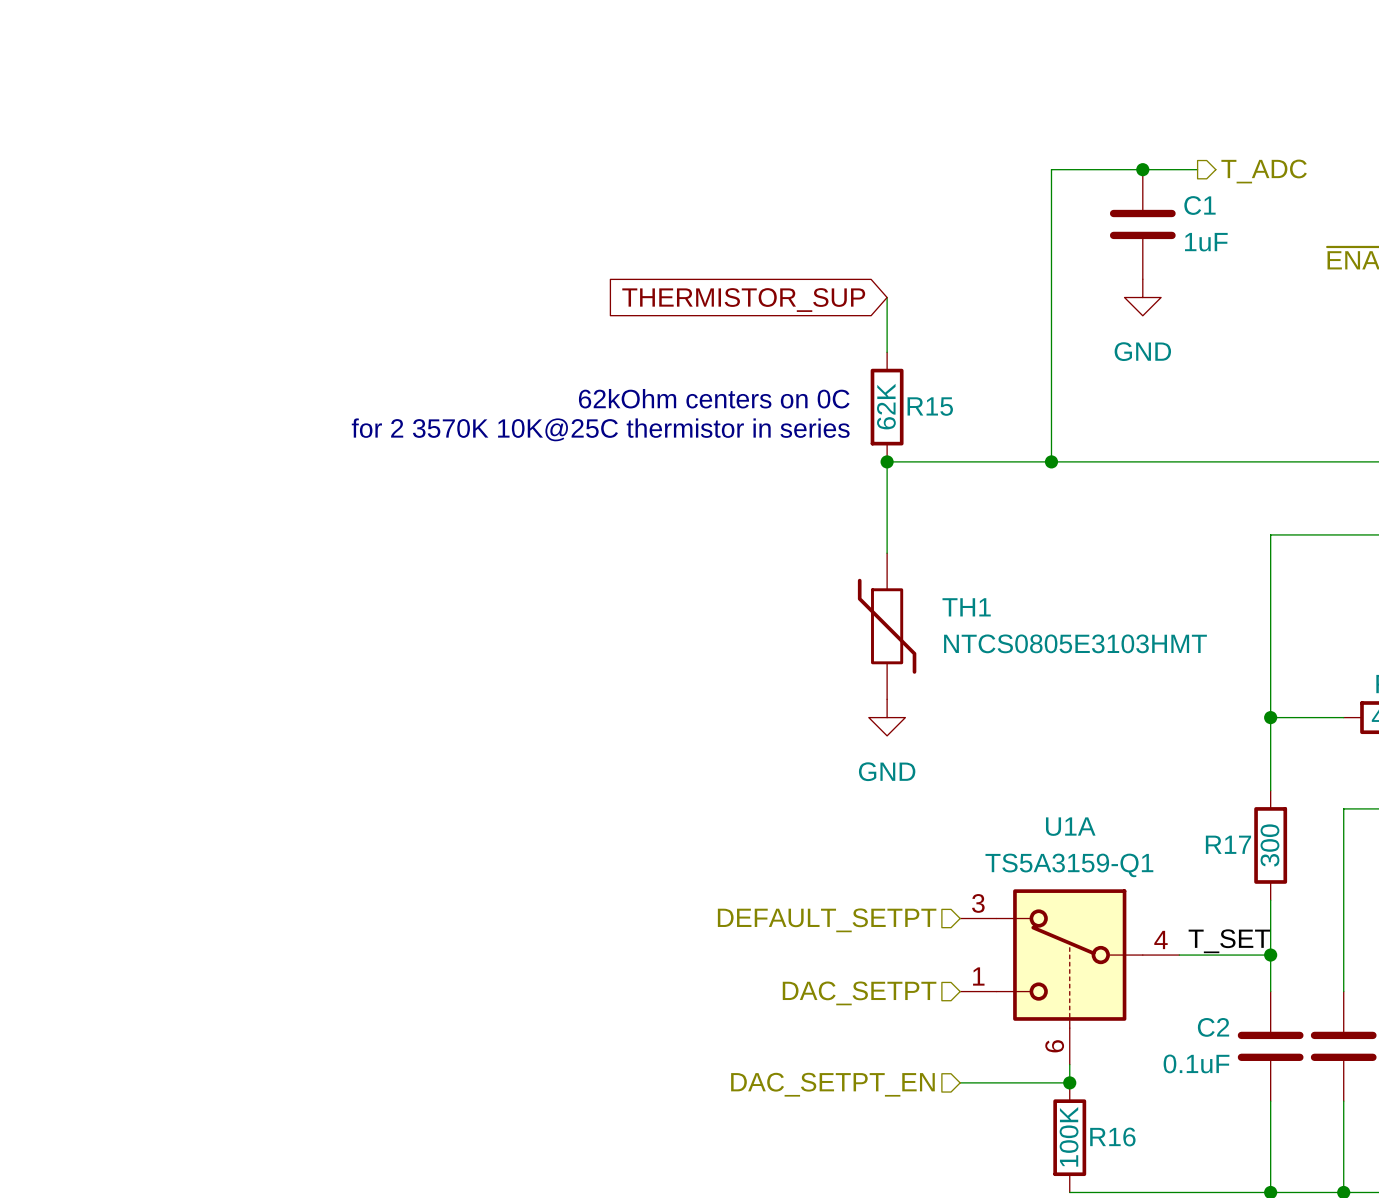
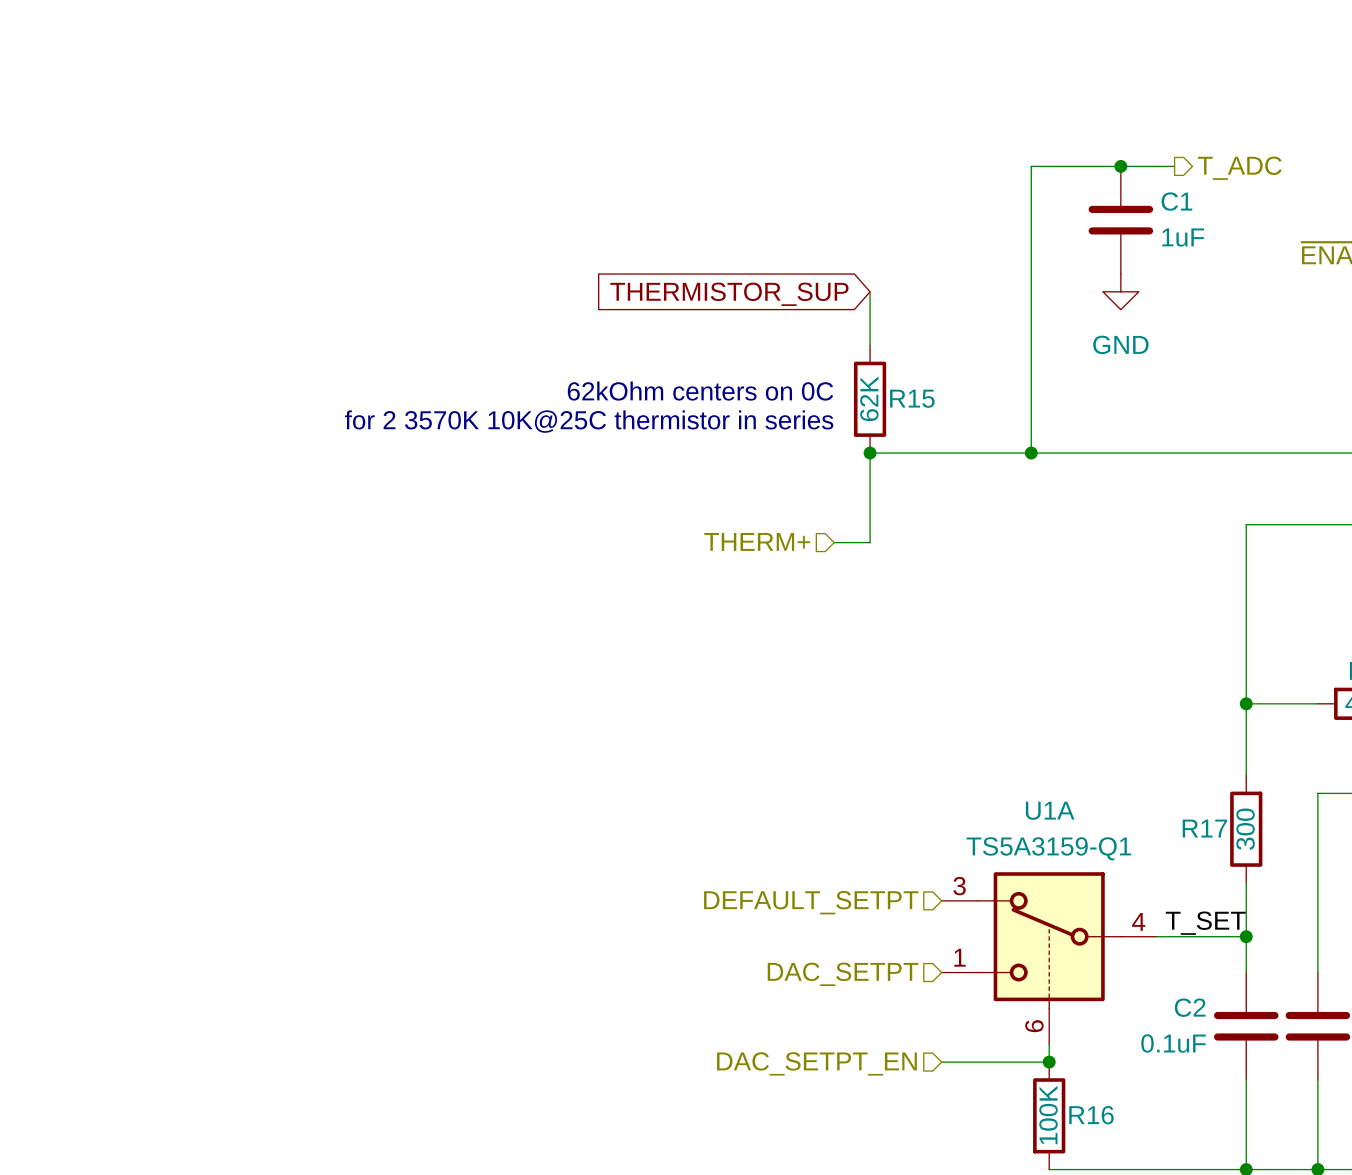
hierarchical label: none -> THERM+ (757, 541)
wire: none -> (834, 542) (870, 542)
TH1: NTCS0805E3103HMT (887, 626) -> none
power symbol: GND (887, 717) -> none

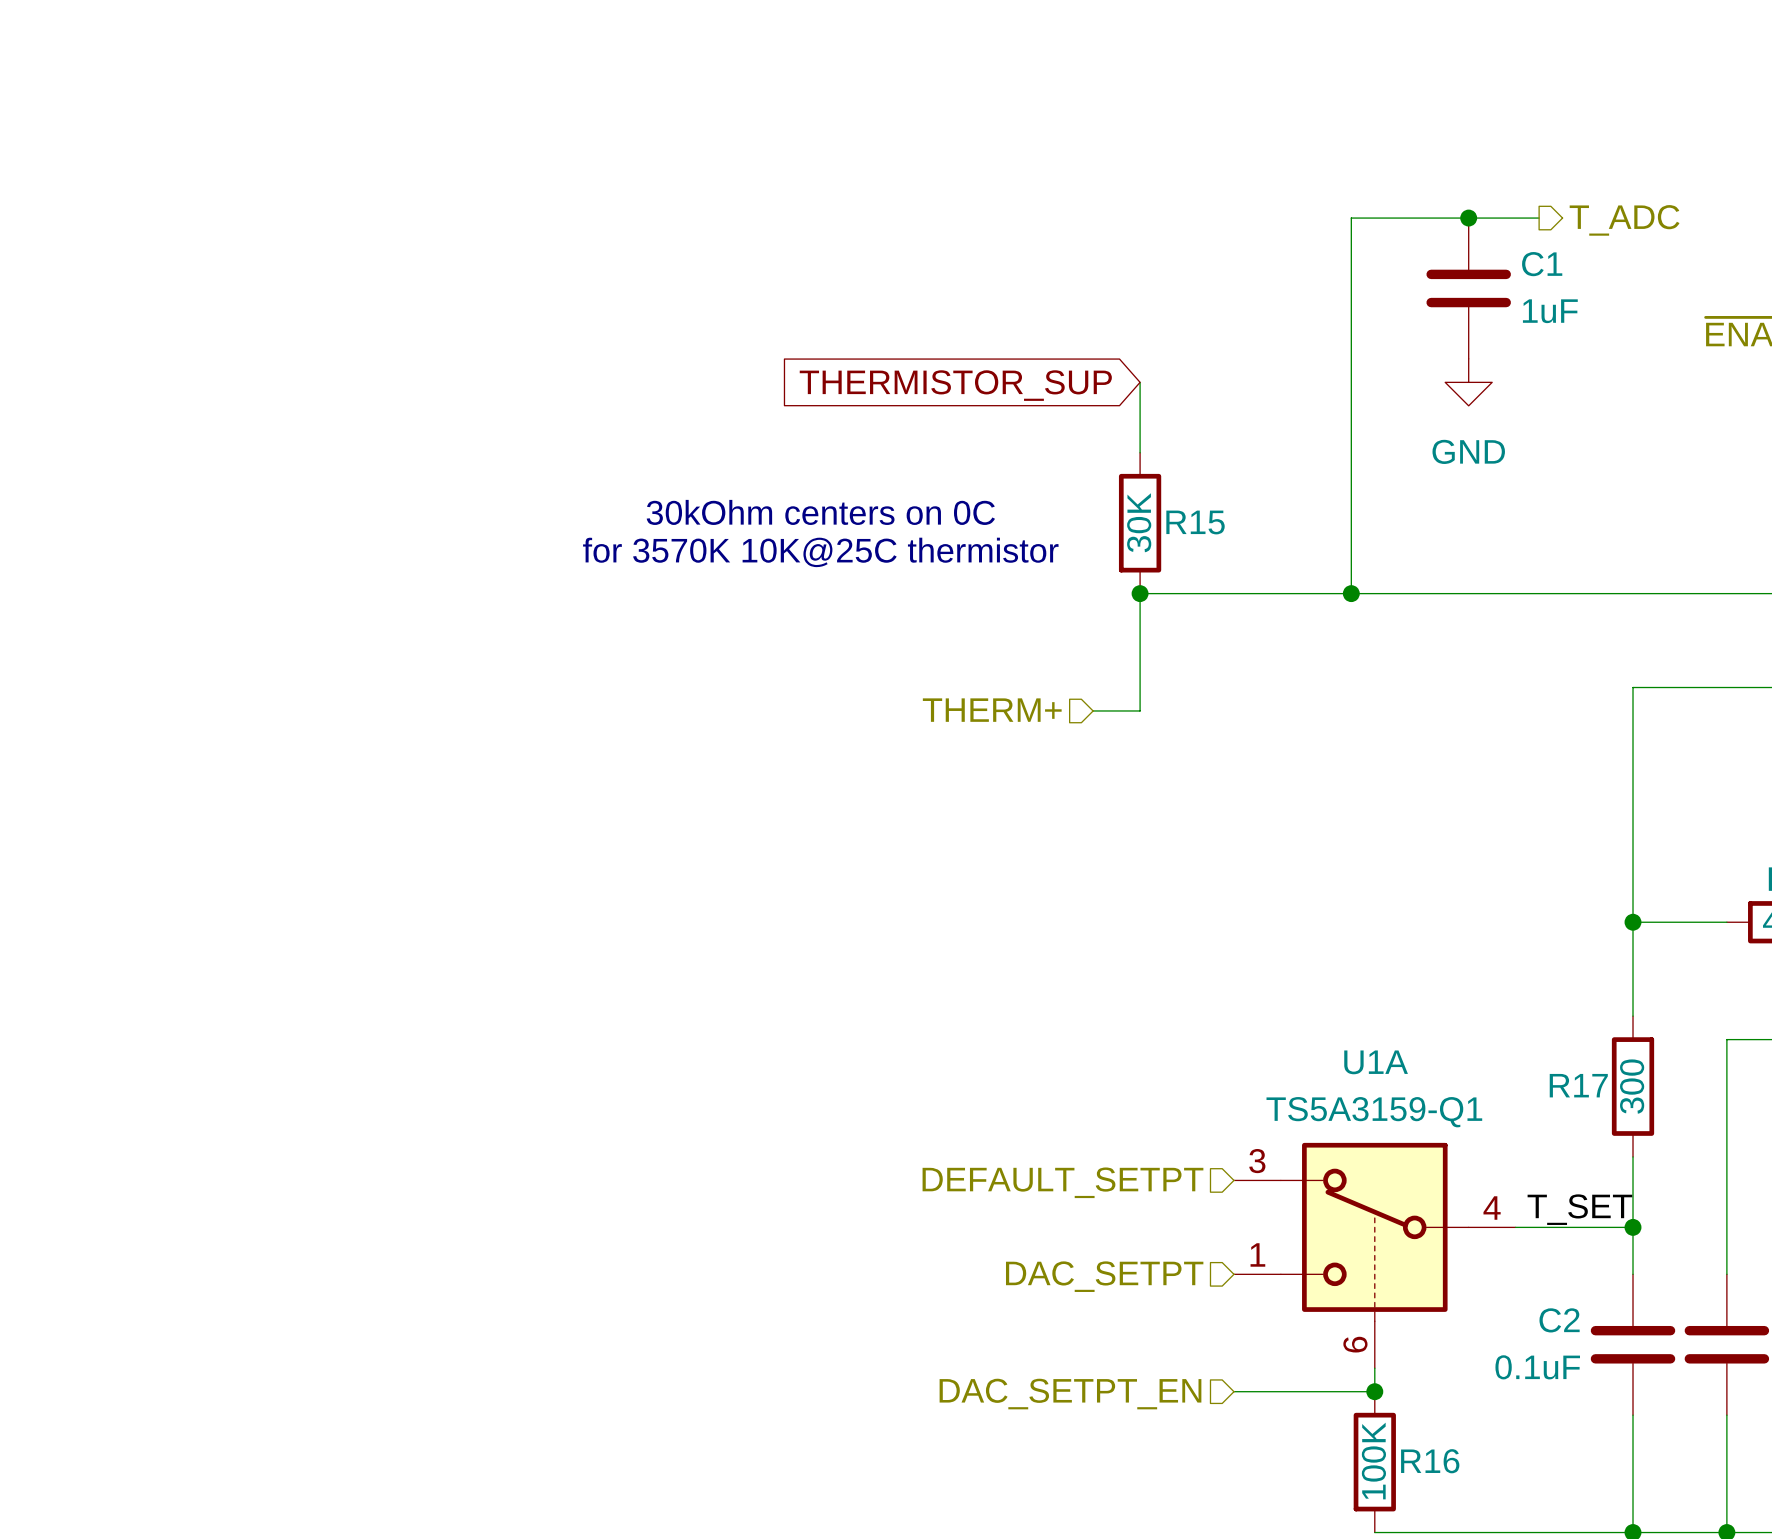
text: 62kOhm centers on 0C (700, 391) -> 30kOhm centers on 0C (820, 512)
R15 value: 62K (869, 398) -> 30K (1139, 522)
text: for 2 3570K 10K@25C thermistor in series (589, 421) -> for 3570K 10K@25C thermistor (820, 552)

